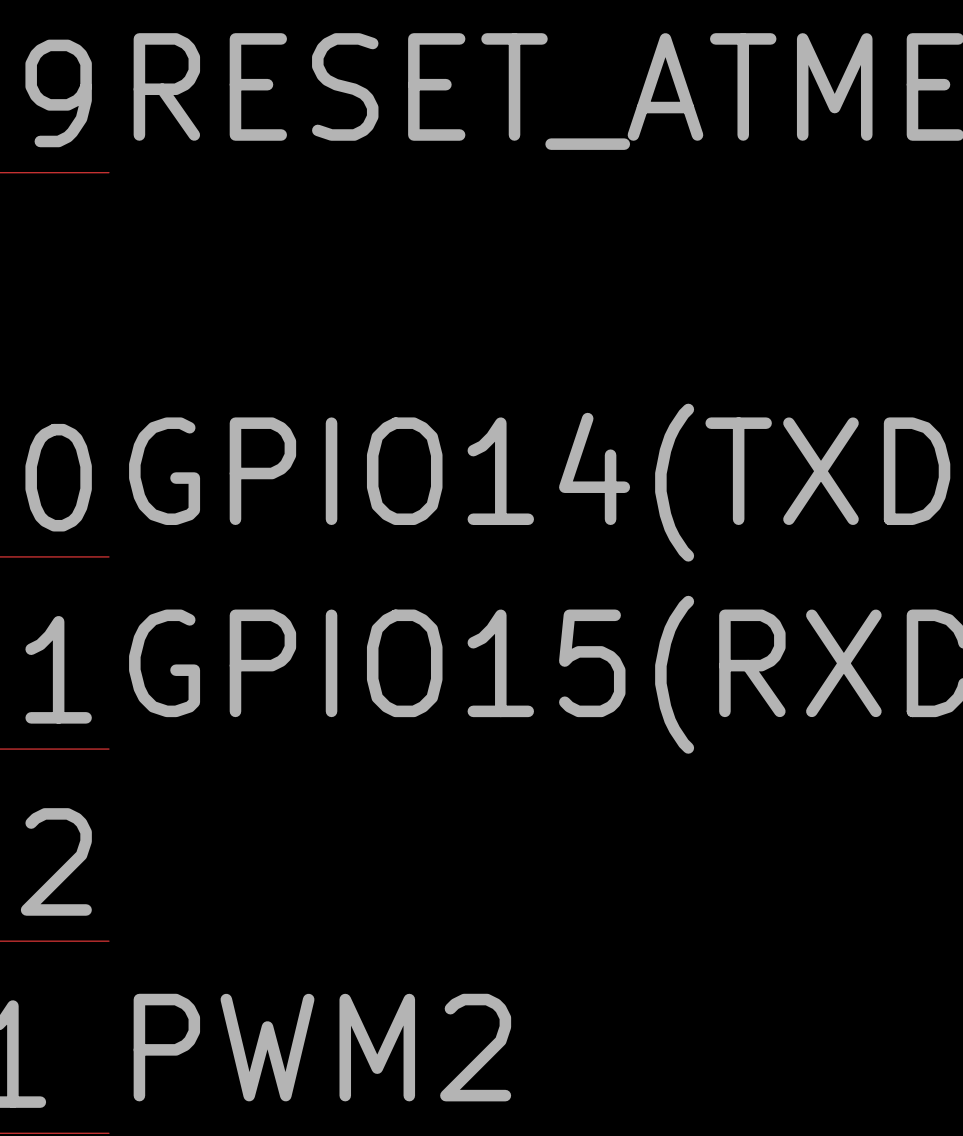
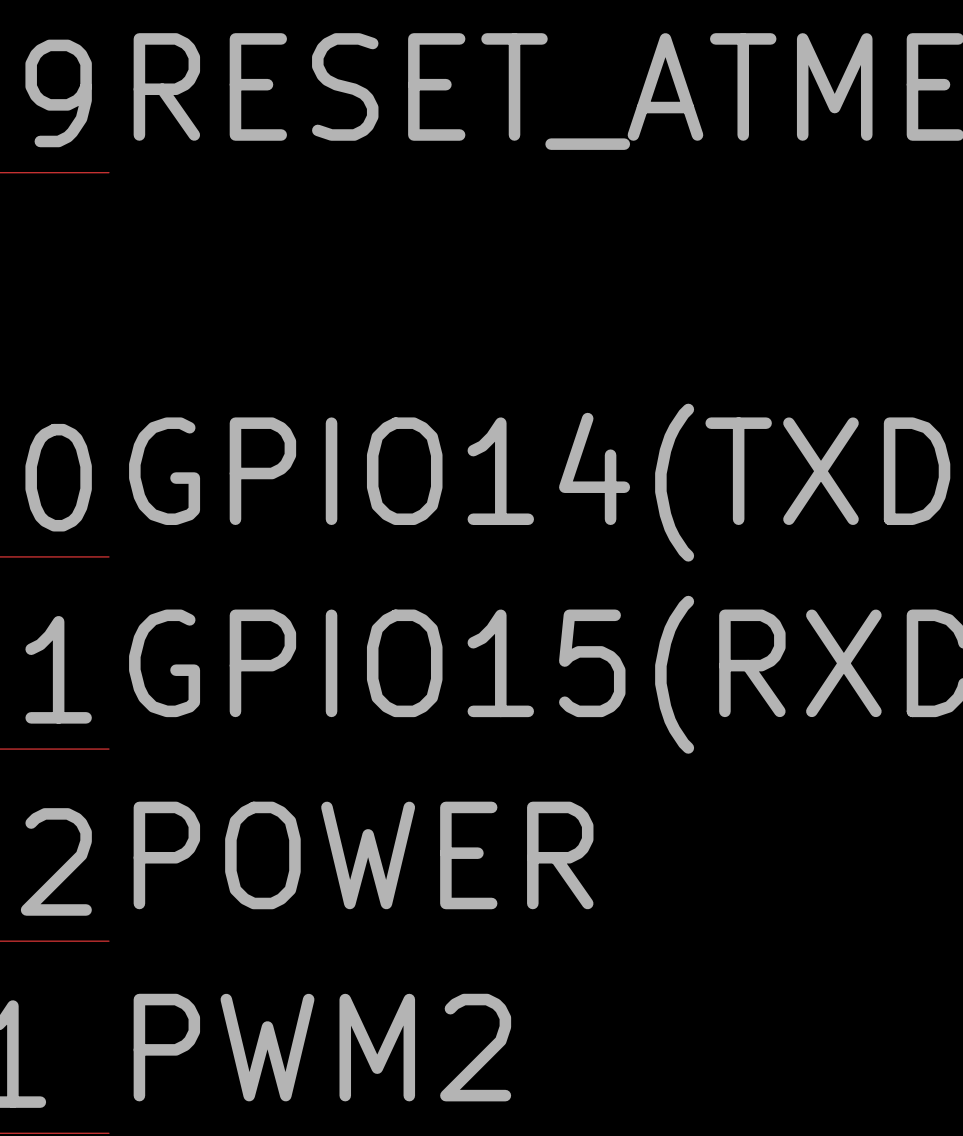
label: none -> POWER (363, 855)

